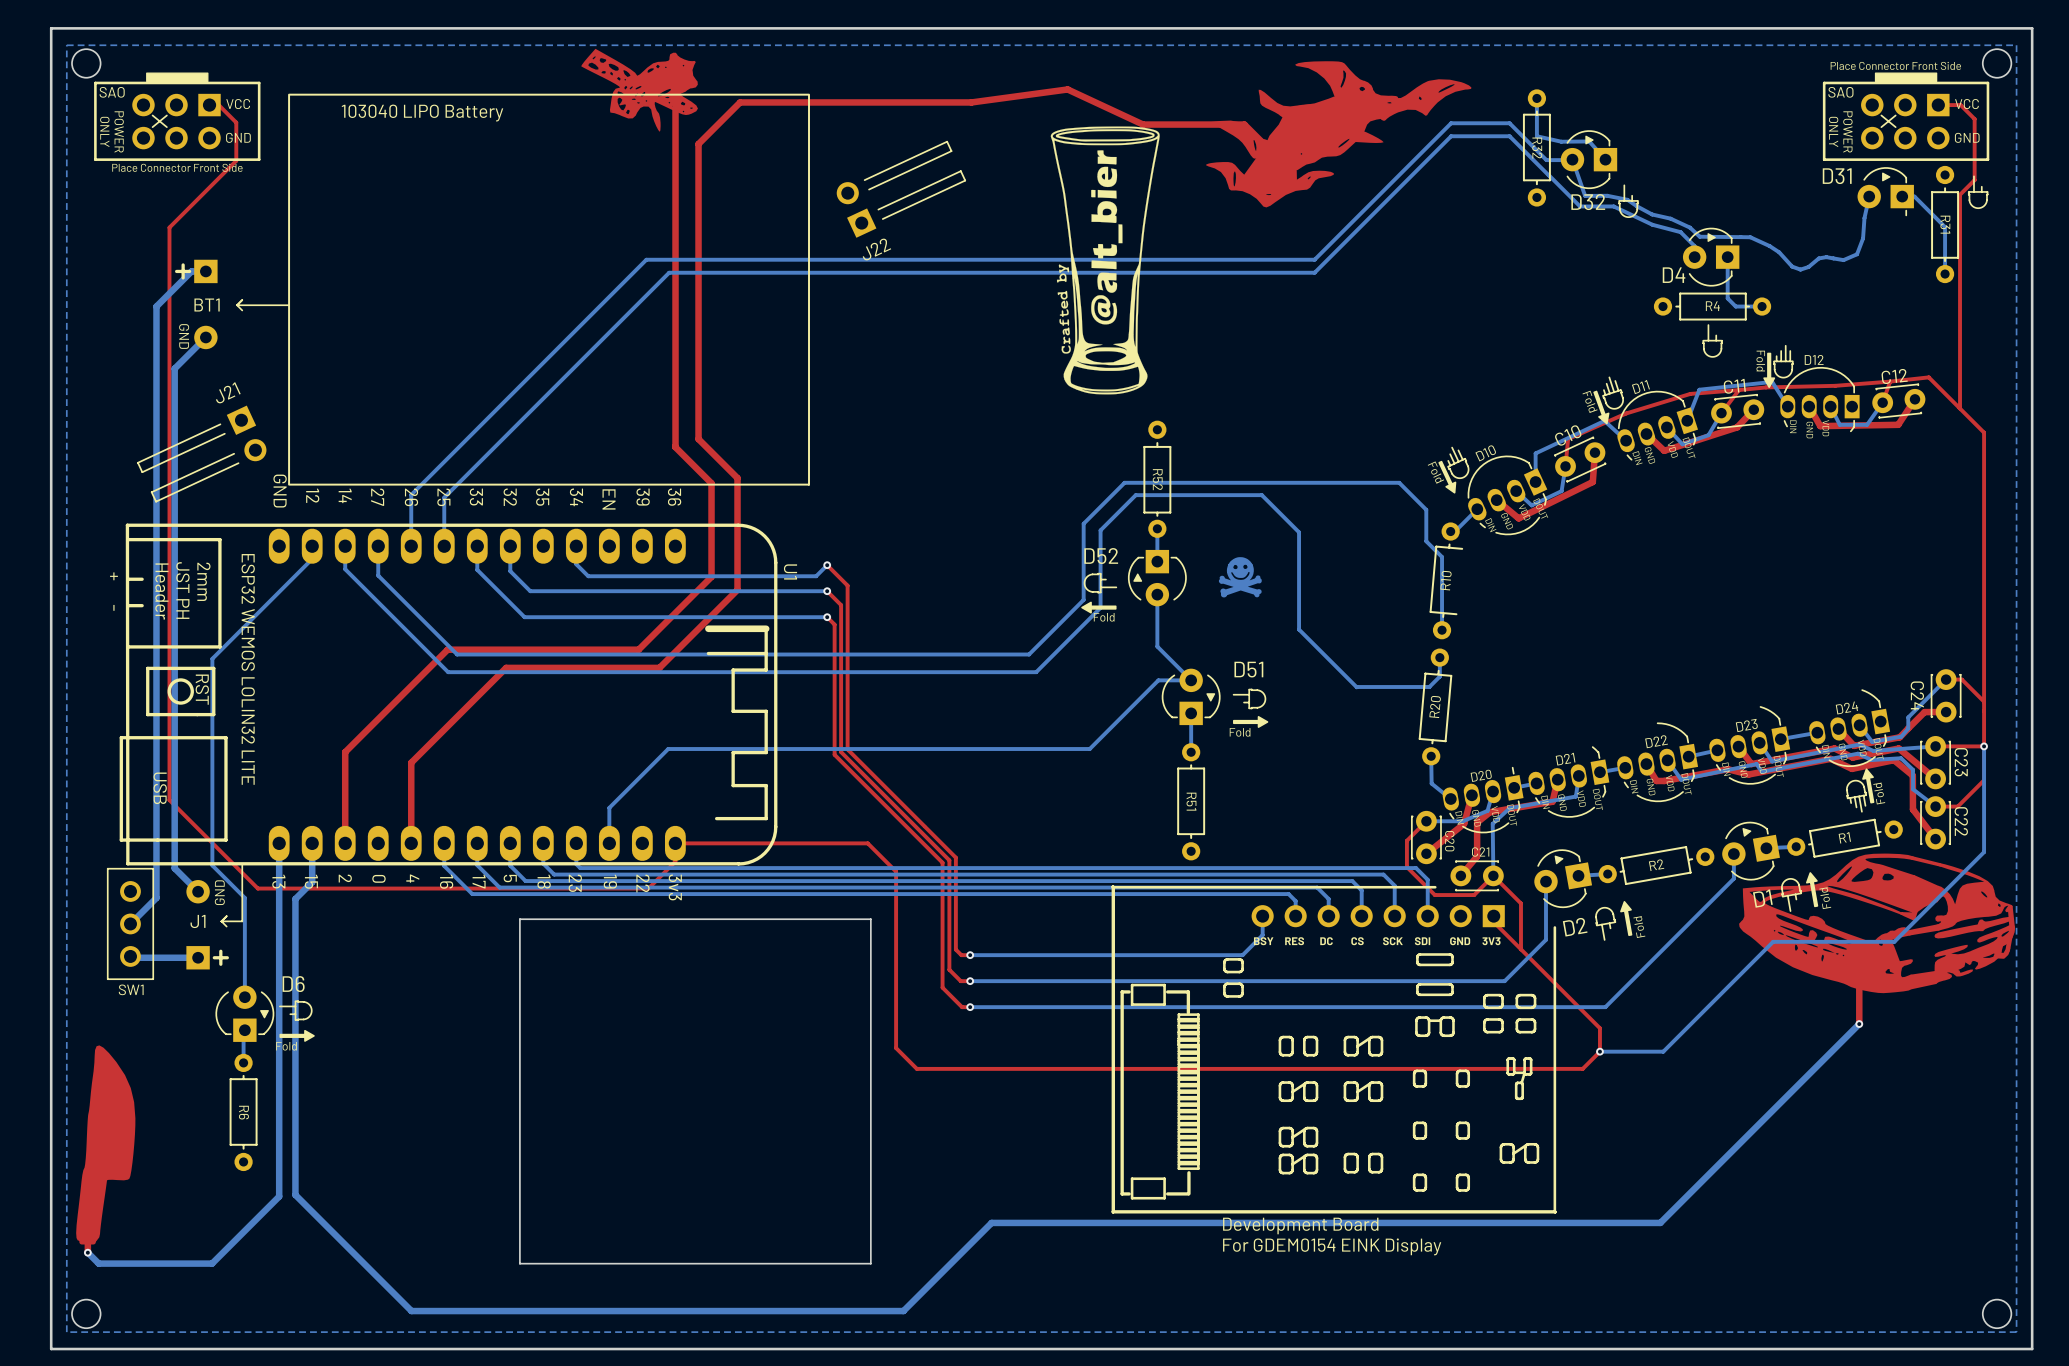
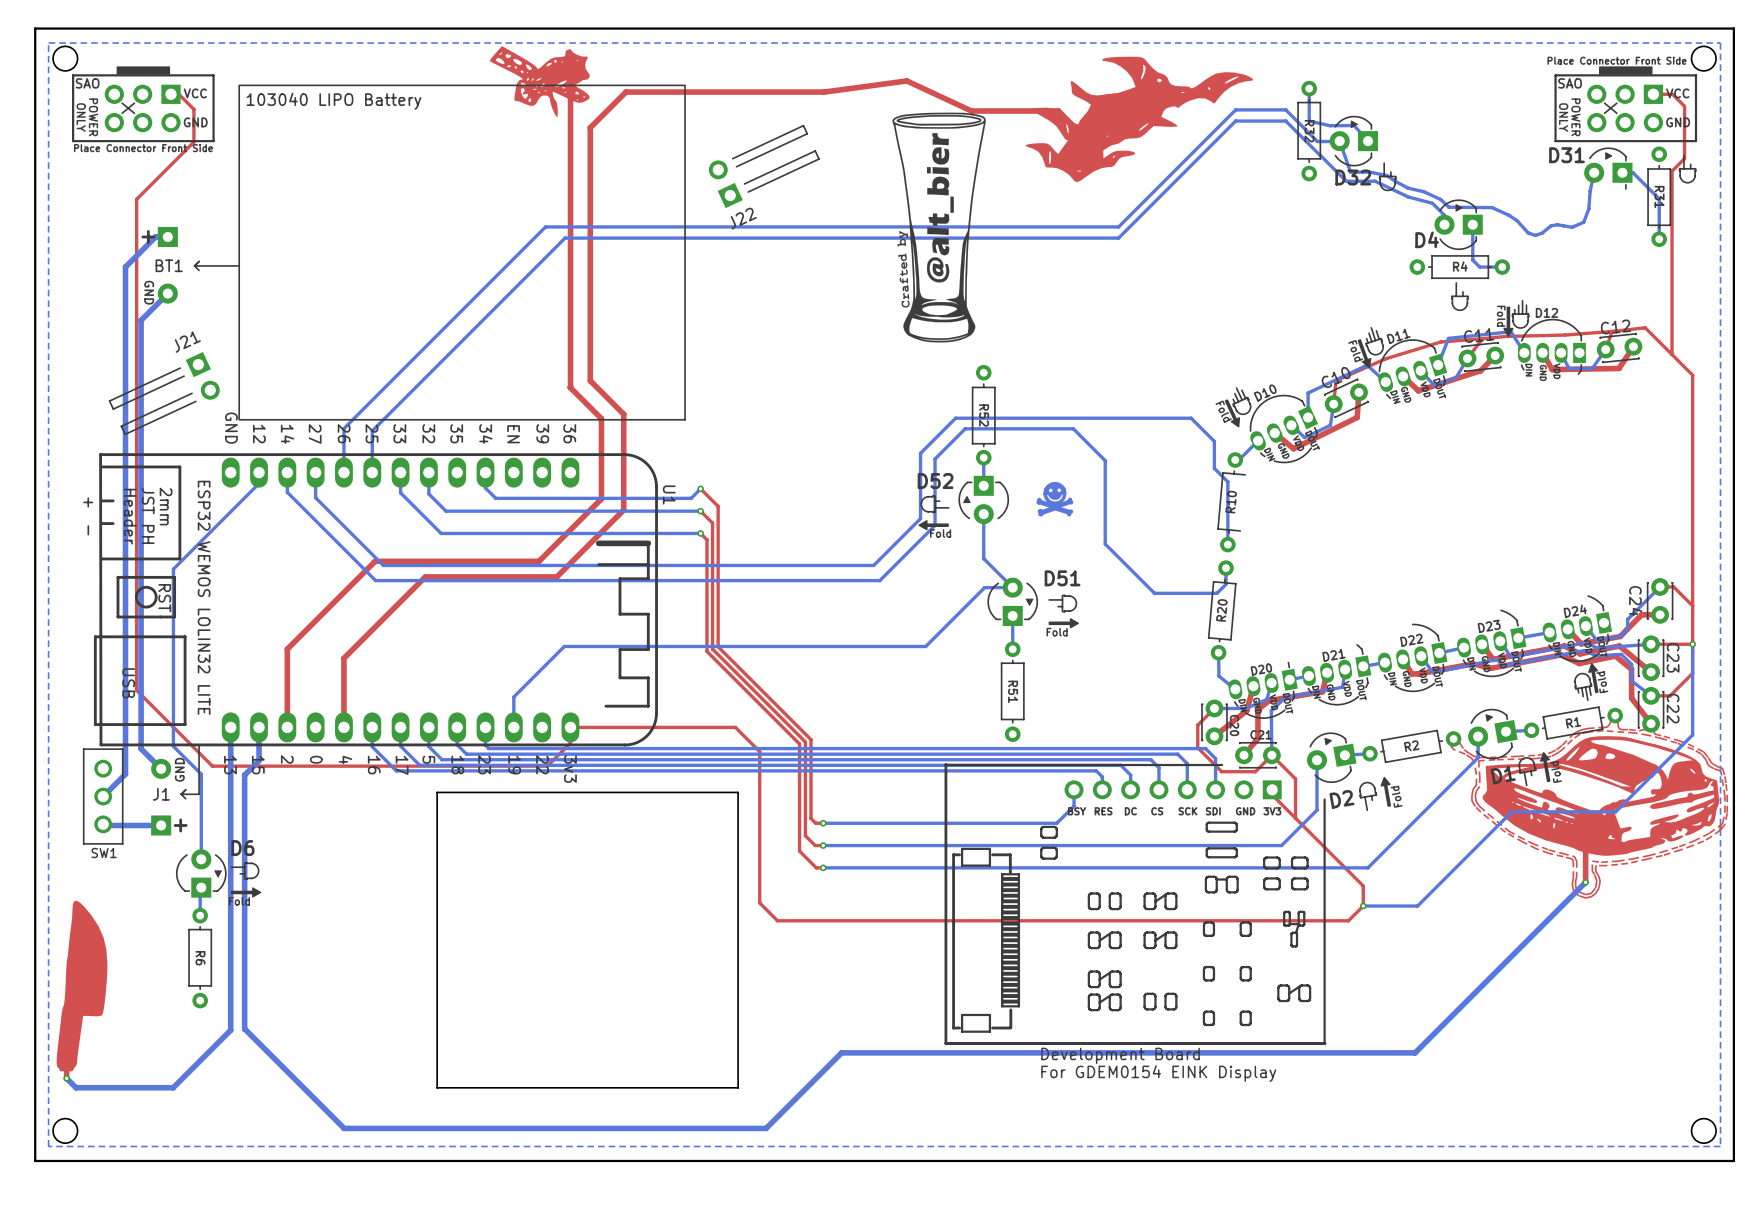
top zone outline: none -> (1720, 825) (1693, 841) (1661, 852) (1617, 861) (1592, 861) (1592, 871) (1596, 881) (1595, 887) (1591, 893) (1585, 894) (1576, 890) (1576, 861) (1574, 856) (1548, 850) (1518, 836) (1508, 831) (1479, 806) (1475, 796) (1479, 786) (1478, 760) (1551, 756) (1580, 734) (1588, 731) (1634, 732) (1661, 738) (1693, 749) (1701, 754) (1708, 765) (1720, 770) (1724, 796) (1724, 812) (1720, 825)
top zone outline: none -> (1720, 829) (1703, 841) (1662, 855) (1628, 863) (1596, 865) (1595, 871) (1600, 881) (1599, 887) (1595, 893) (1585, 897) (1578, 895) (1573, 890) (1572, 858) (1548, 853) (1523, 842) (1505, 832) (1475, 806) (1471, 800) (1473, 789) (1476, 785) (1474, 761) (1471, 758) (1450, 746) (1459, 743) (1468, 753) (1479, 757) (1537, 755) (1556, 749) (1576, 731) (1587, 728) (1606, 727) (1611, 720) (1617, 720) (1619, 728) (1621, 729) (1653, 730) (1654, 734) (1679, 740) (1703, 751) (1711, 763) (1722, 768) (1726, 784) (1727, 813) (1724, 824) (1720, 829)

